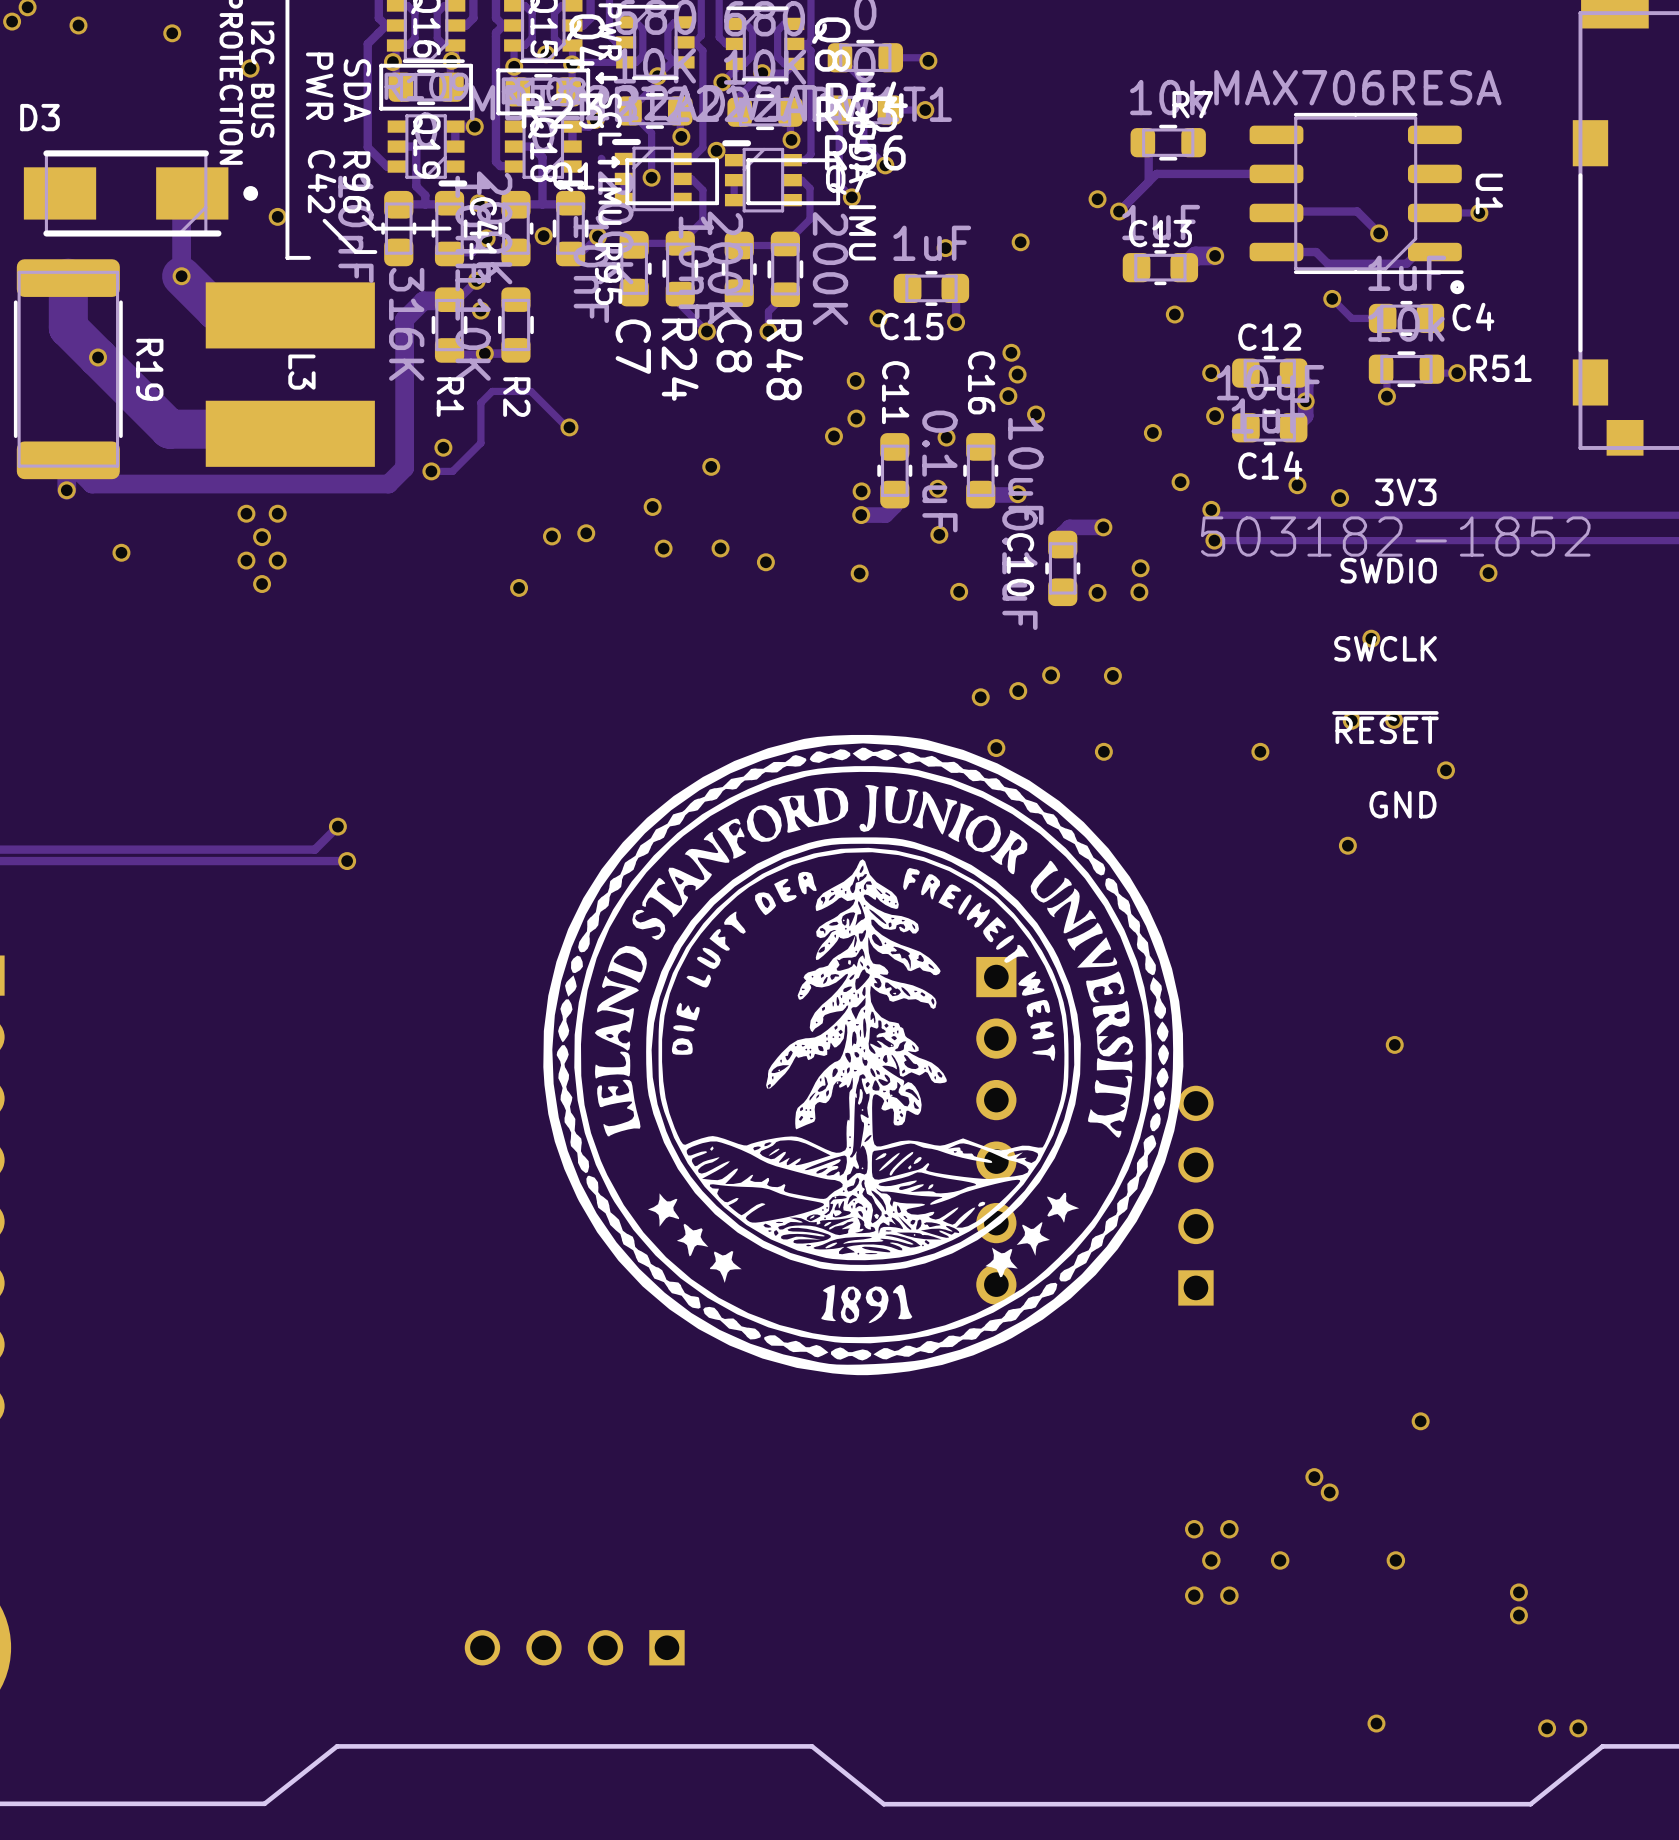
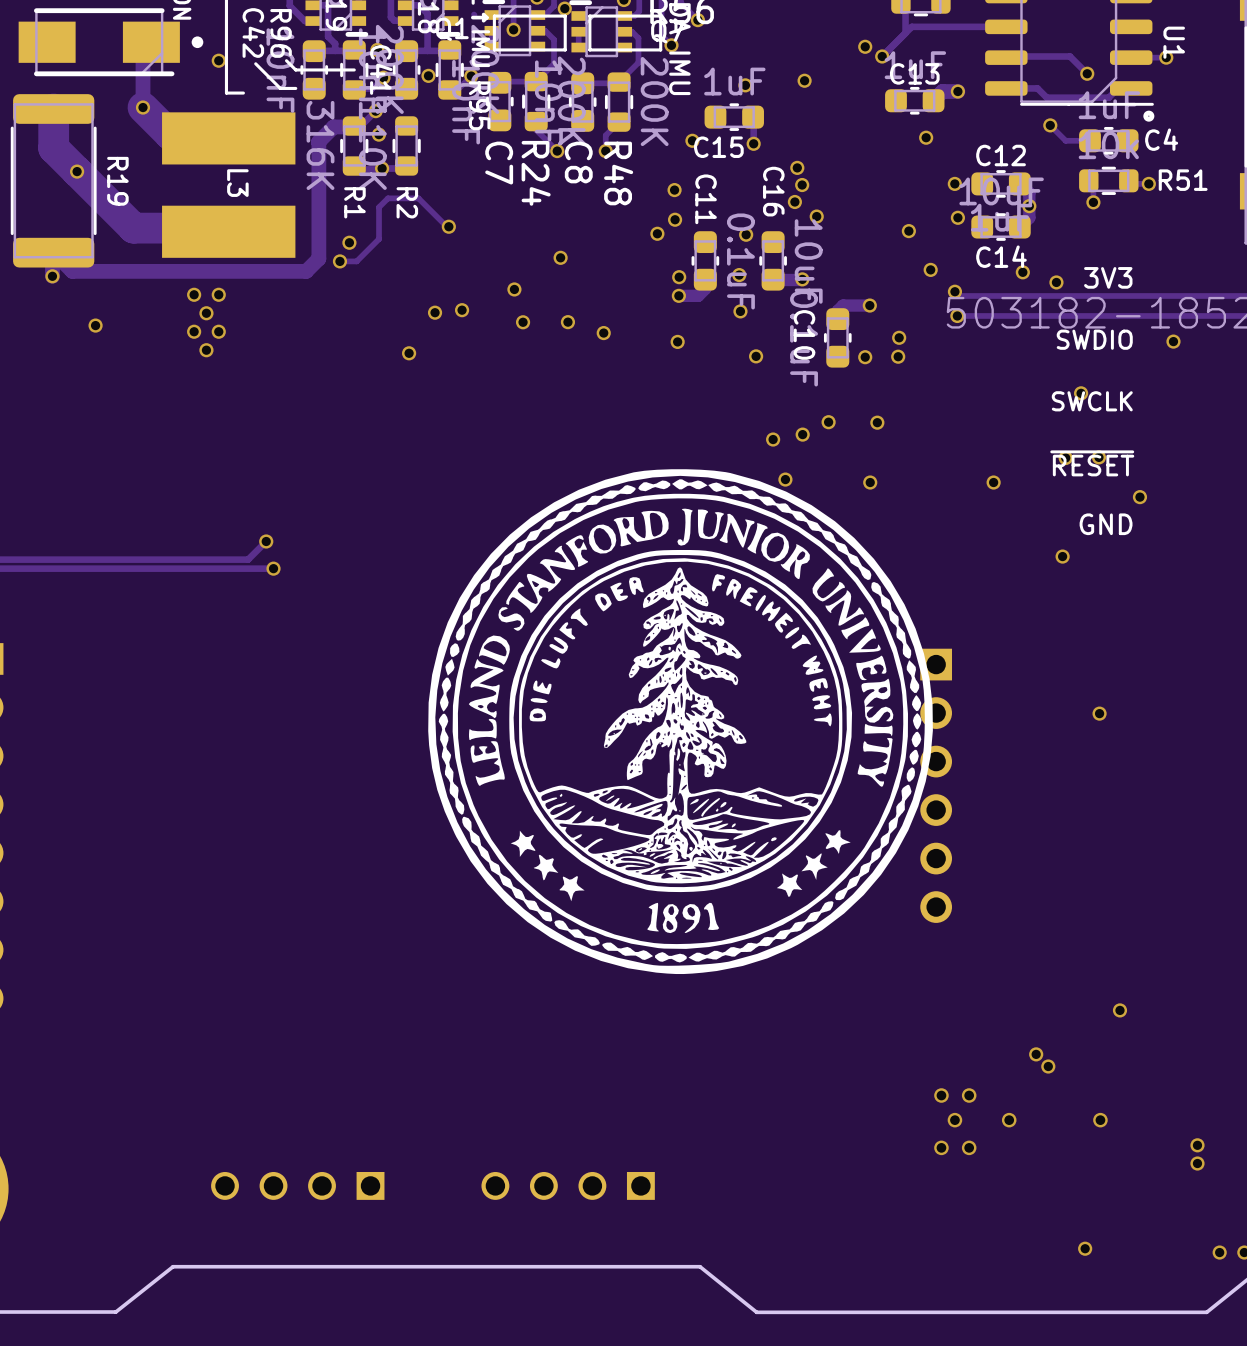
part position: (996, 1130) -> (936, 785)
part: (1195, 1195) -> none
part: none -> (297, 1185)
part: none -> (568, 1185)
part: (574, 1647) -> none
board edge: (337, 1746) (264, 1803) (147, 1803) -> (265, 1266) (173, 1266) (115, 1312)
board edge: (812, 1746) (883, 1804) (959, 1804) -> (640, 1266) (700, 1266) (756, 1312)

